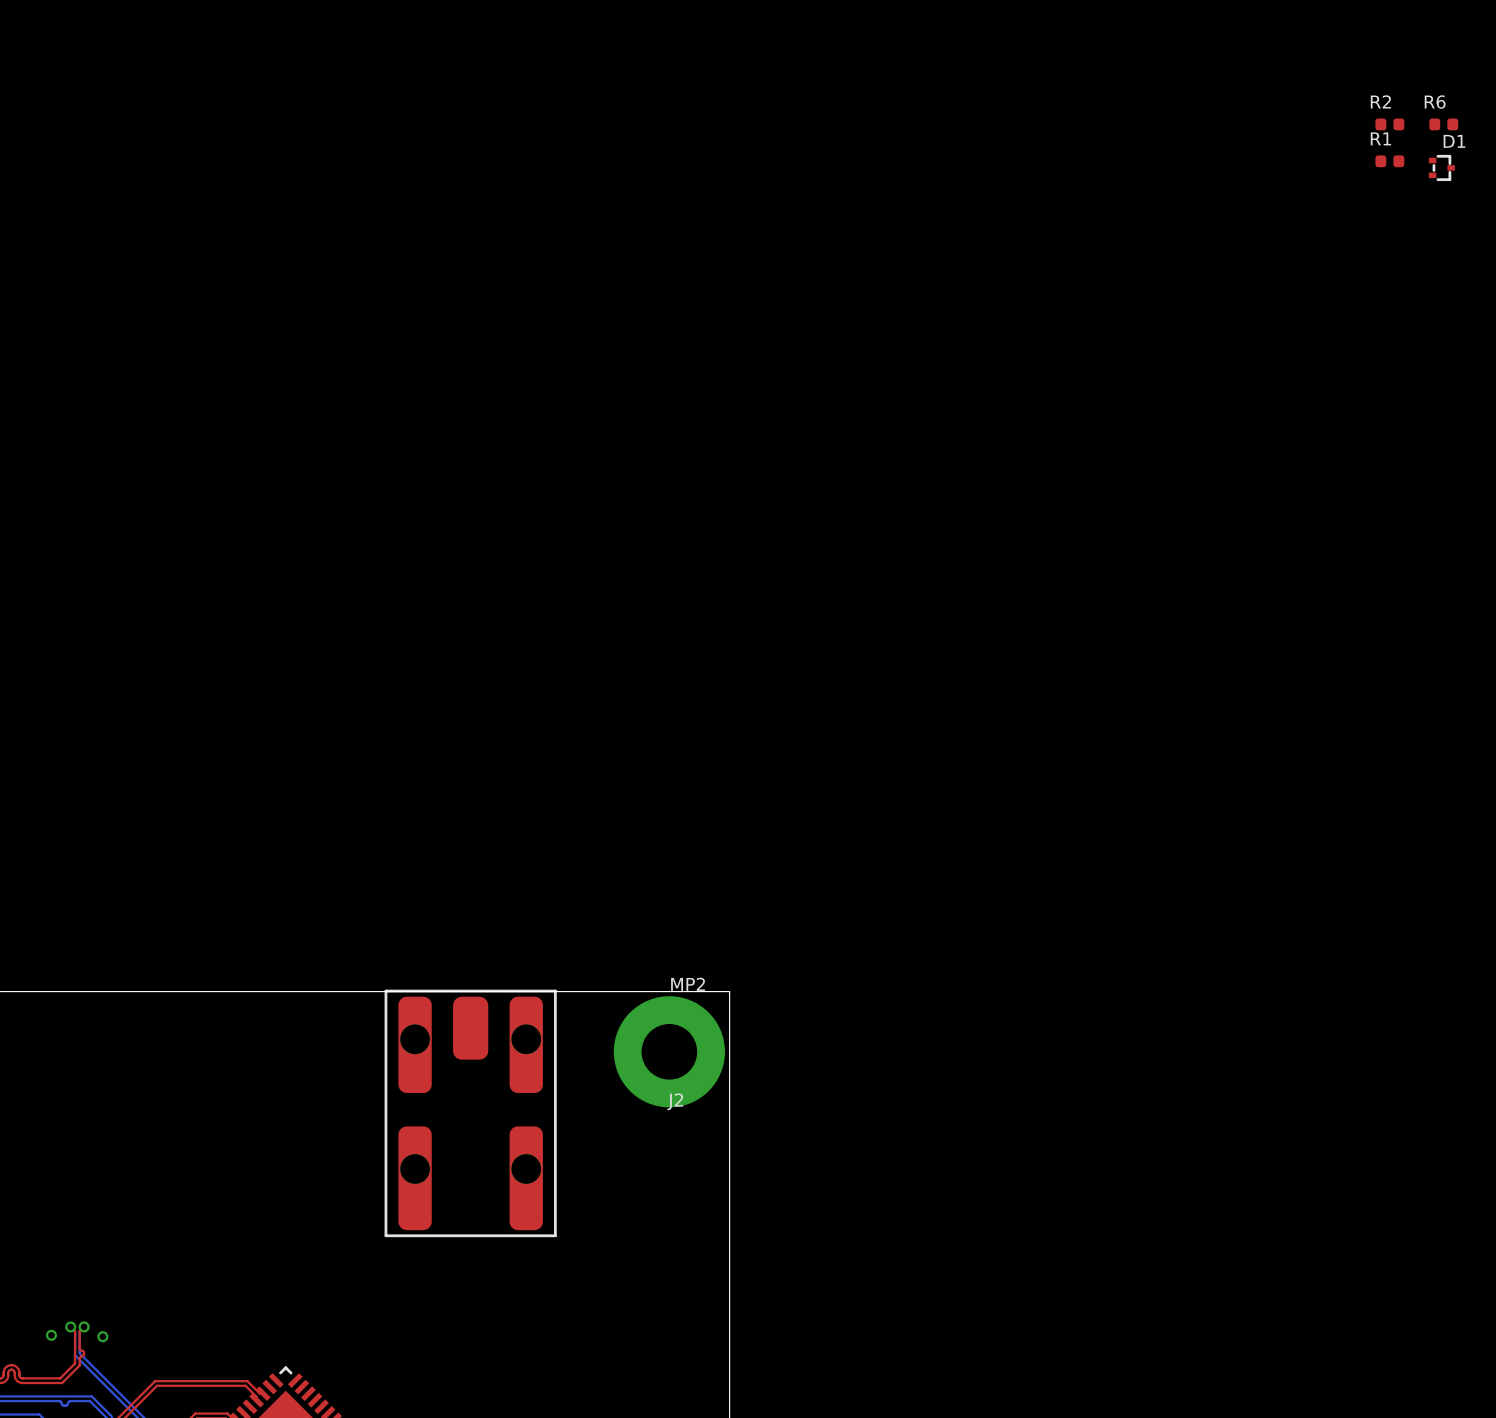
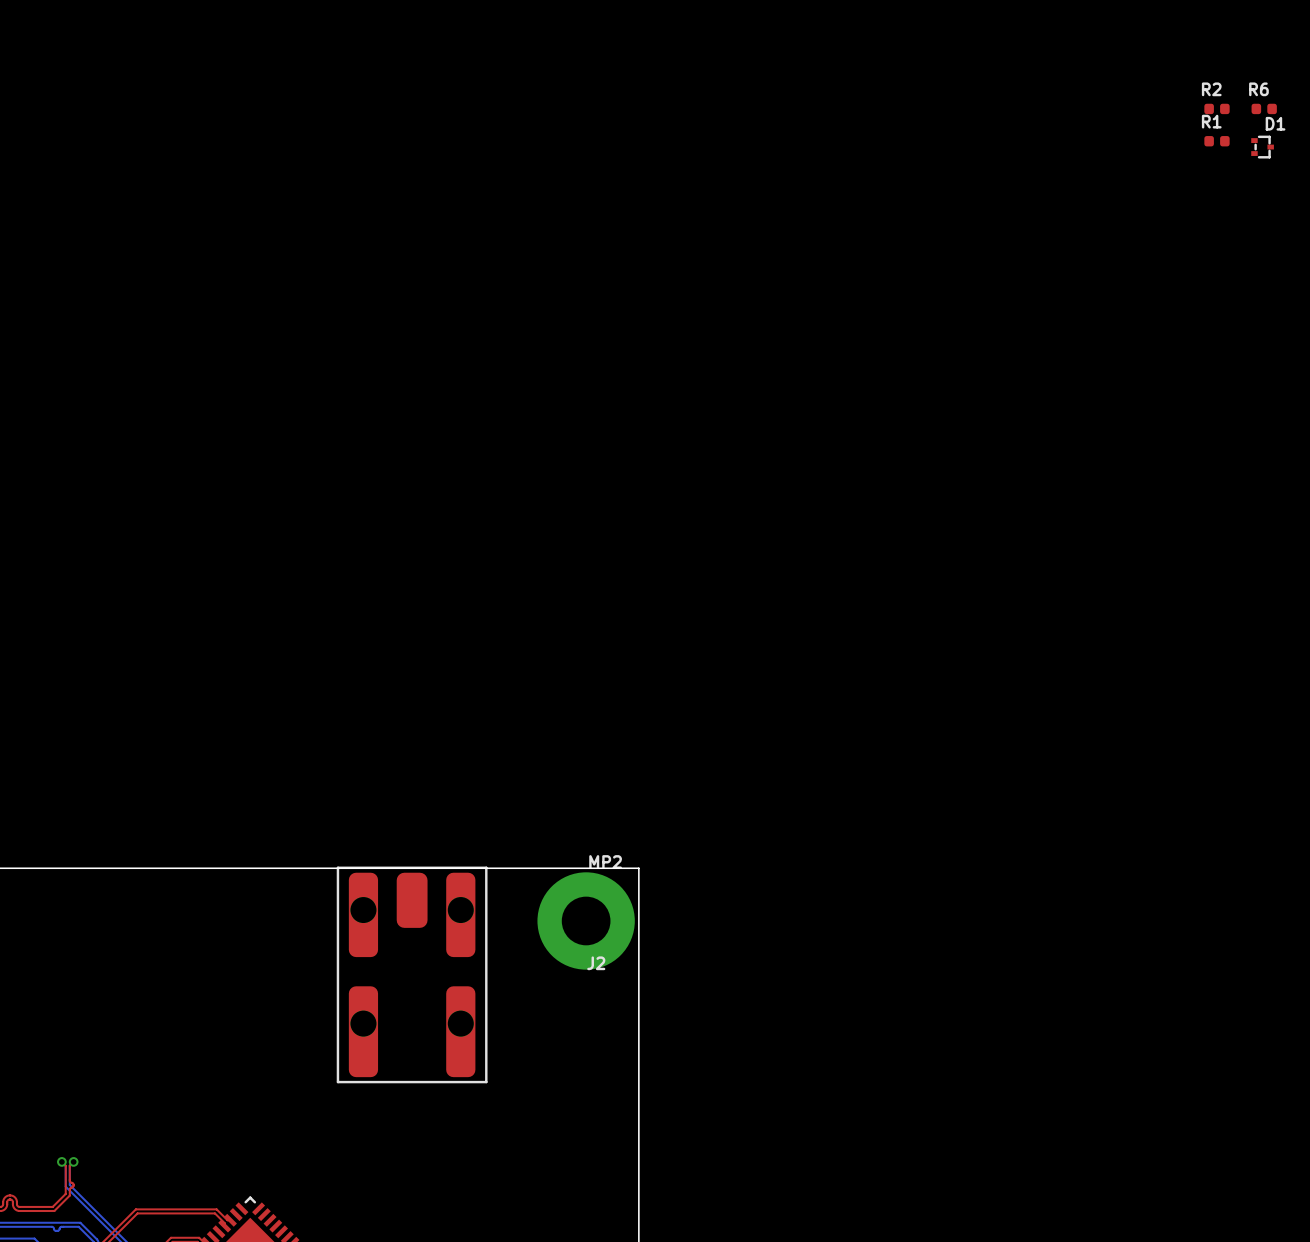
via: (51, 1335) -> none
via: (102, 1336) -> none

